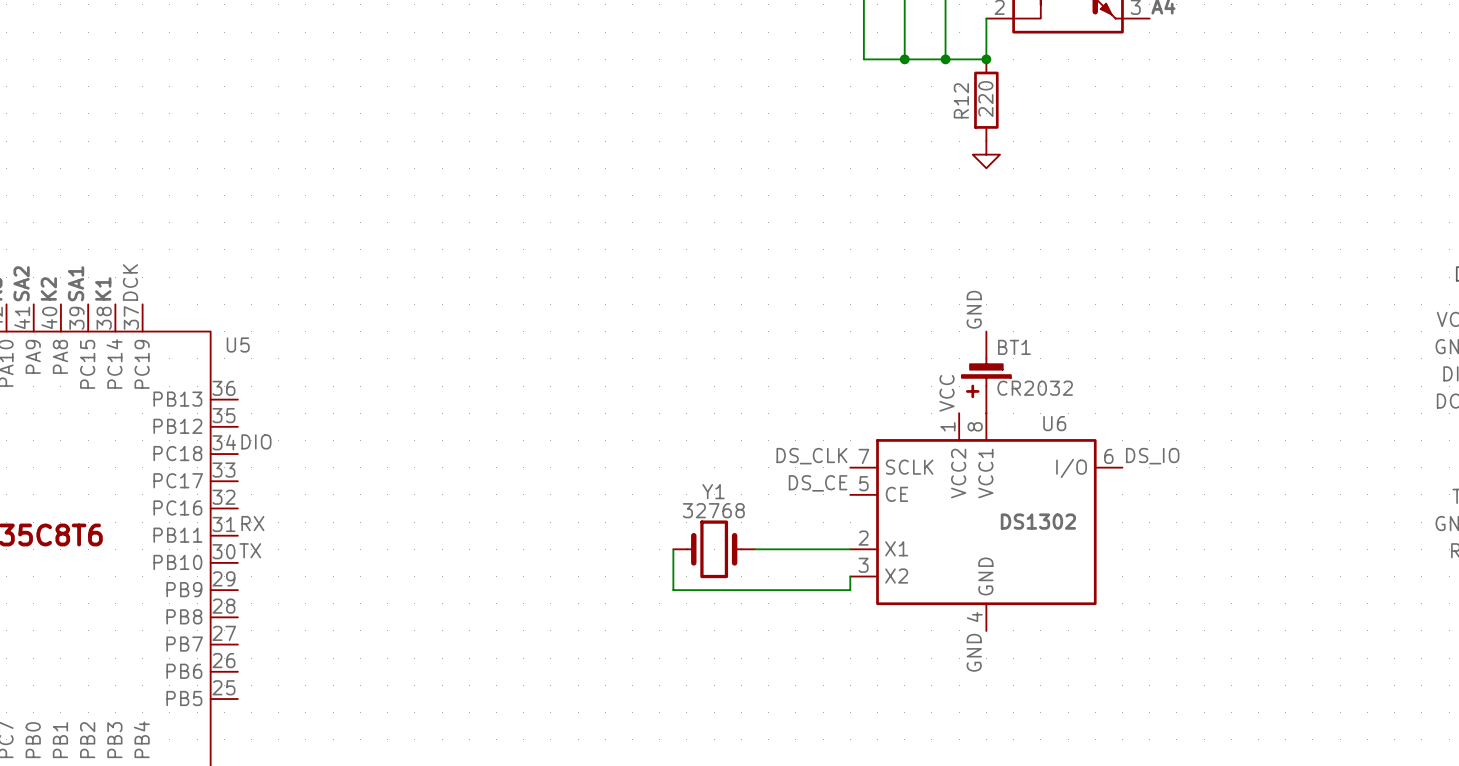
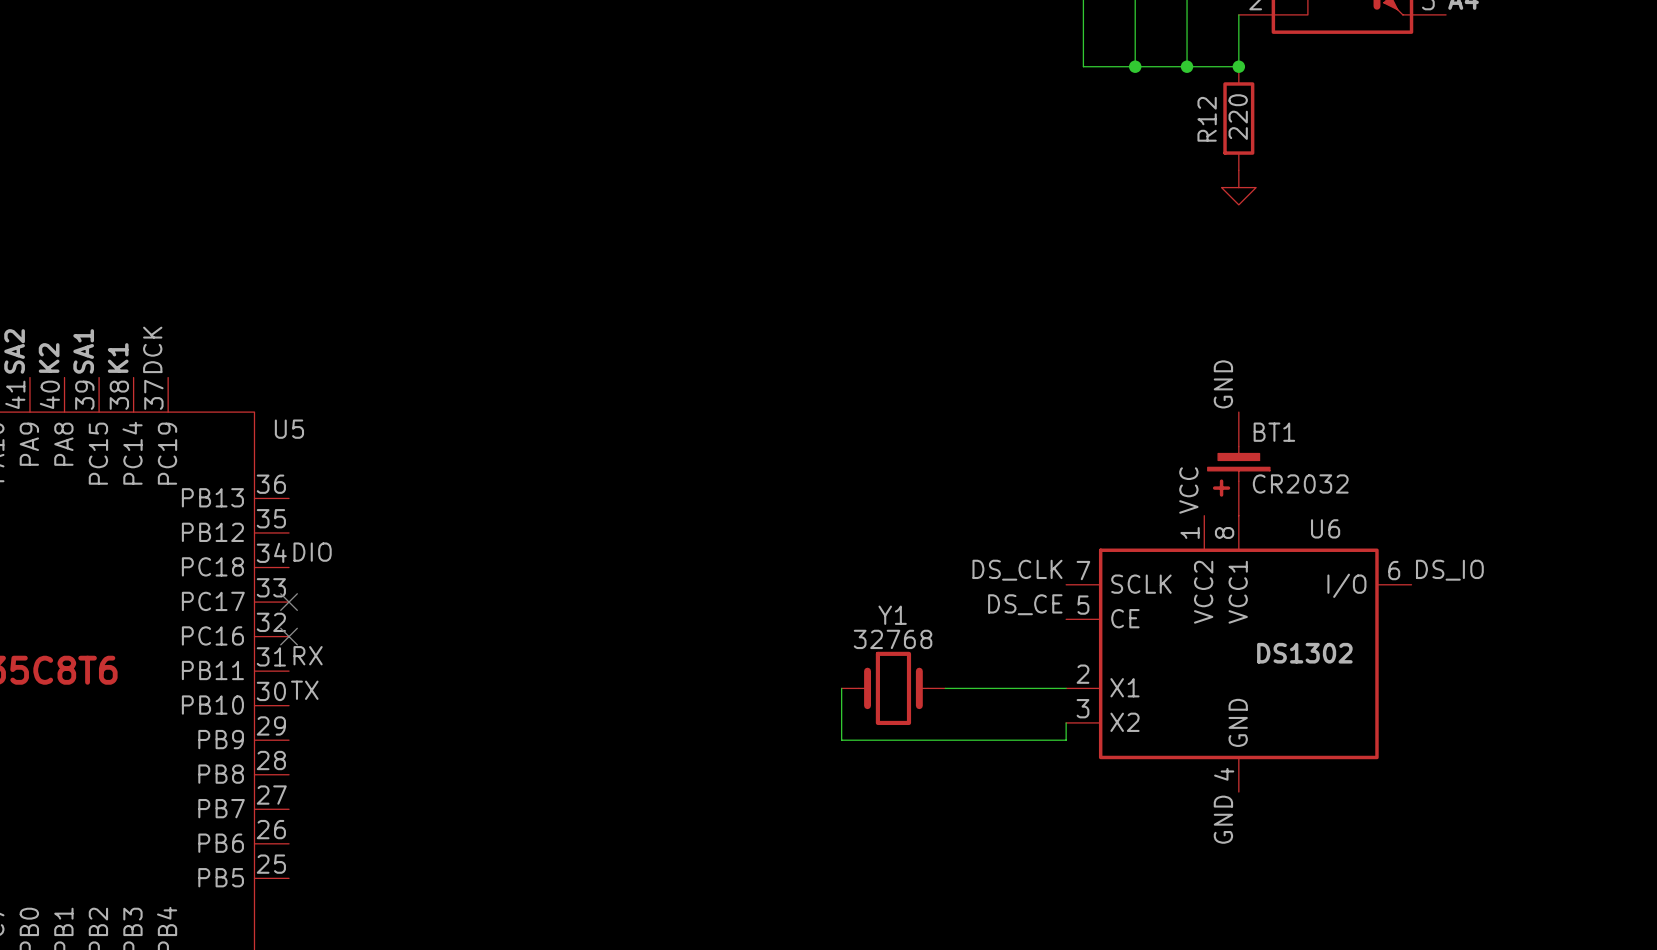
no-connect mark: none -> (289, 602)
no-connect mark: none -> (289, 636)

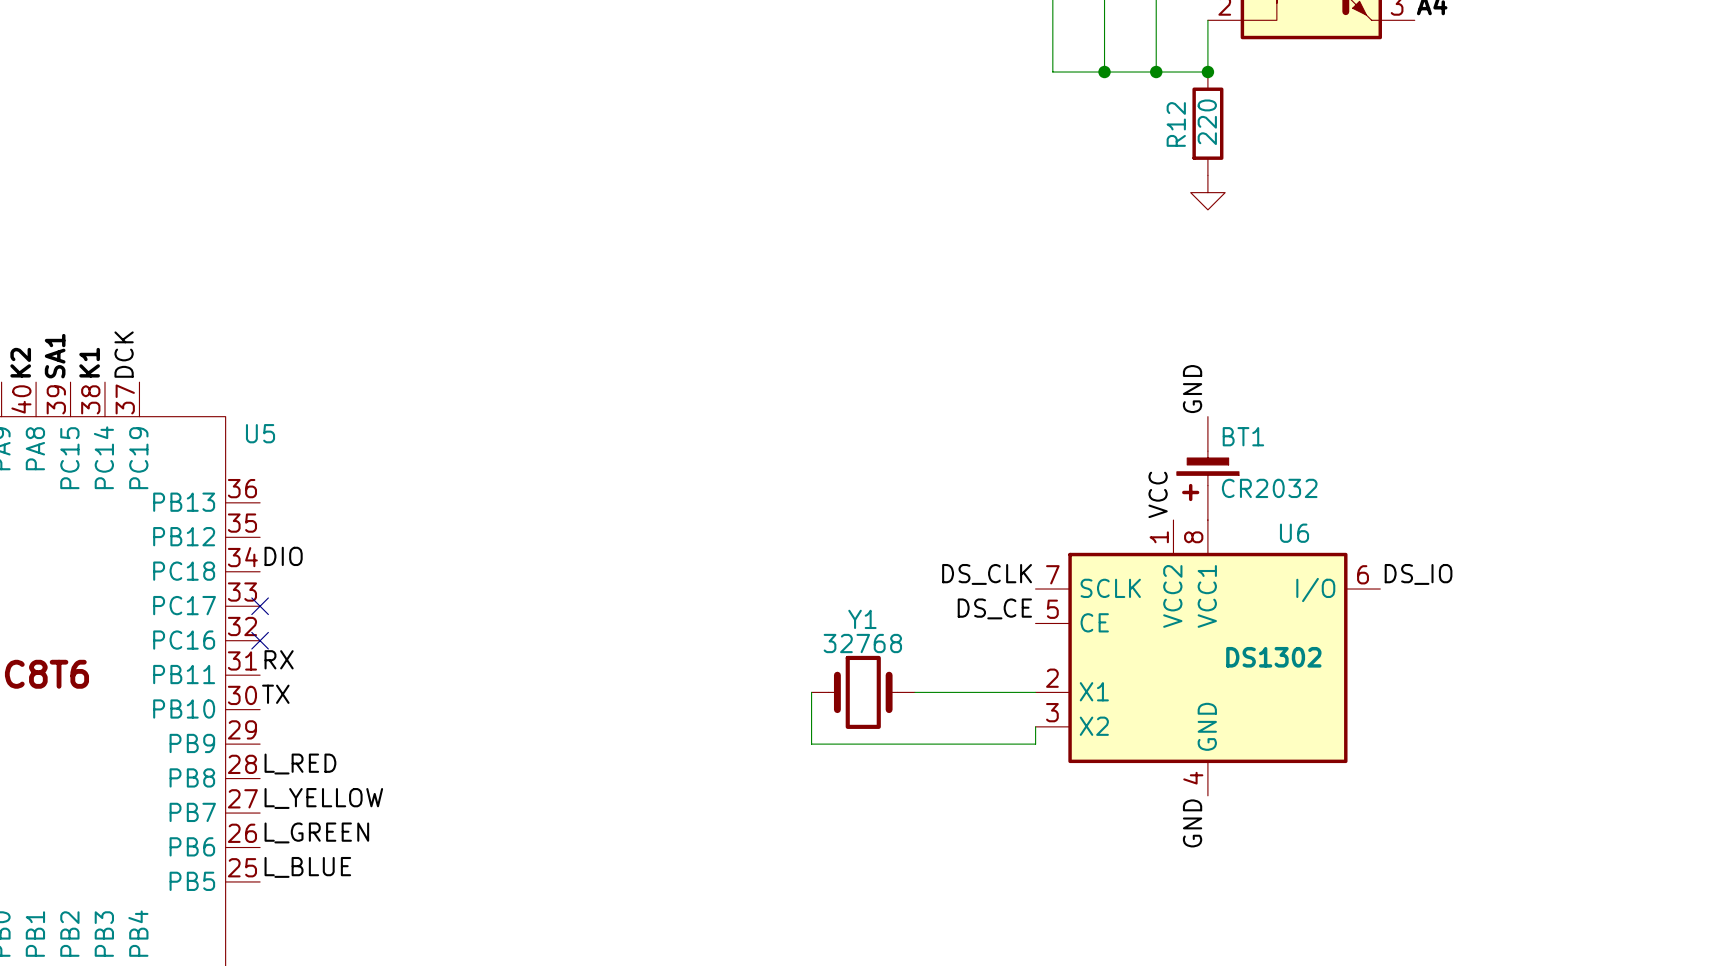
label: none -> L_RED (300, 764)
label: none -> L_YELLOW (323, 798)
label: none -> L_GREEN (316, 832)
label: none -> L_BLUE (307, 867)

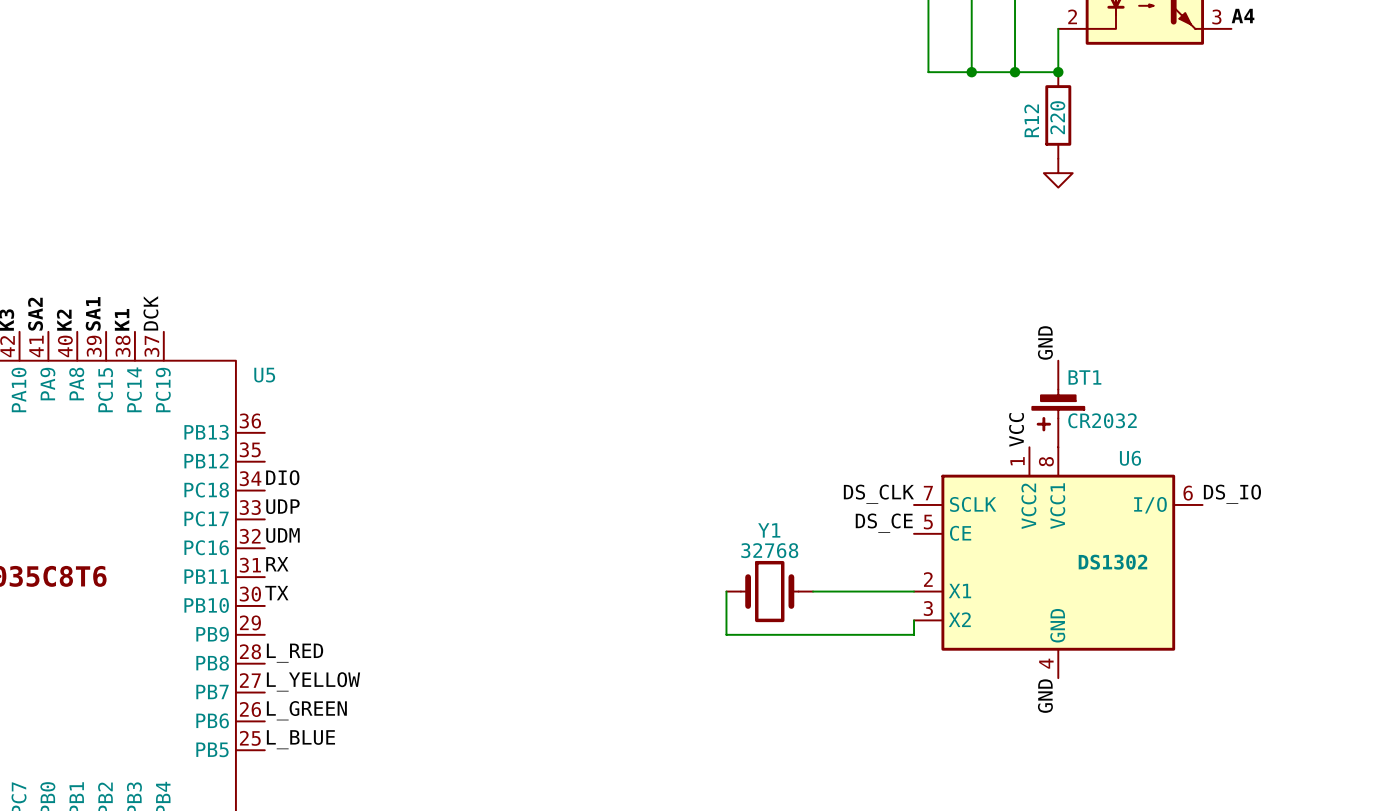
label: none -> UDP (282, 506)
no-connect mark: (260, 606) -> none
label: none -> UDM (282, 535)
no-connect mark: (260, 640) -> none

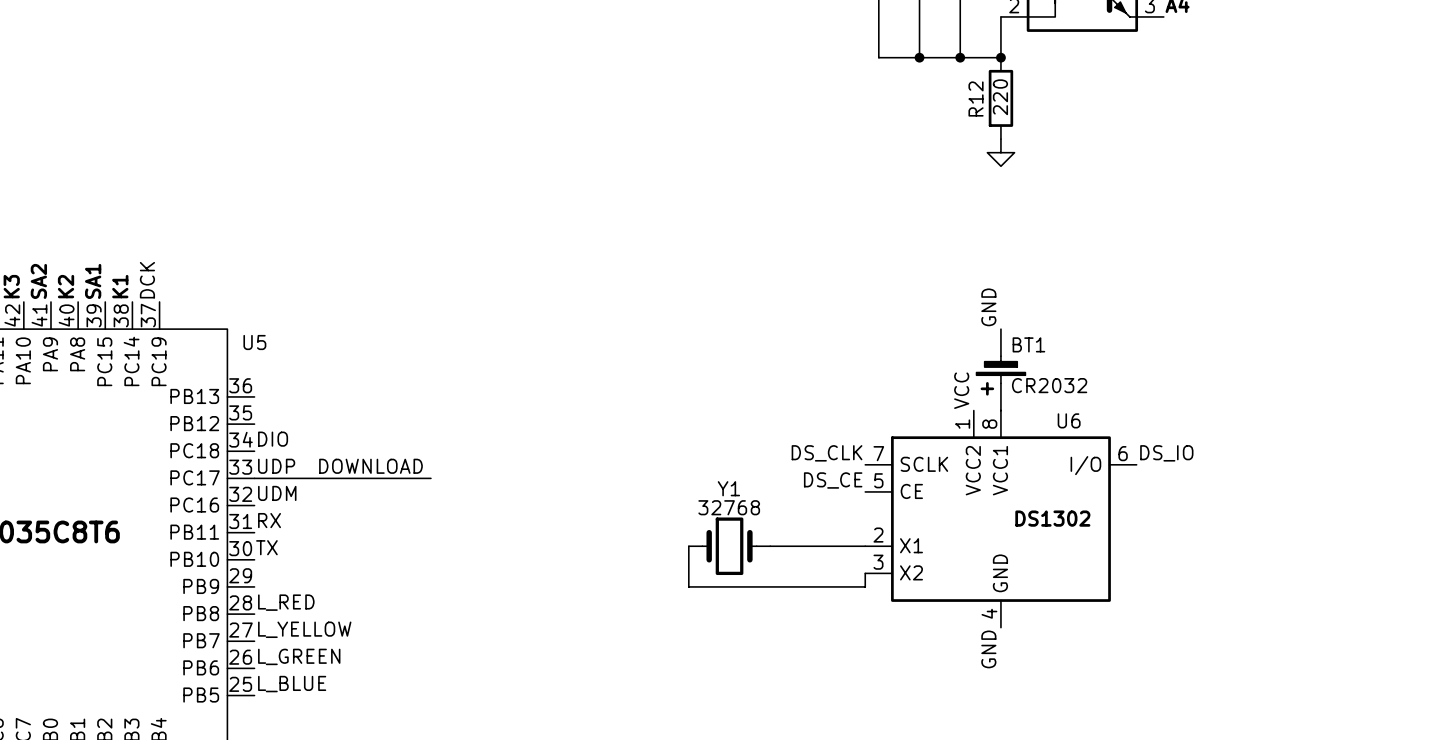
label: none -> DOWNLOAD (370, 466)
wire: none -> (254, 478) (430, 478)

